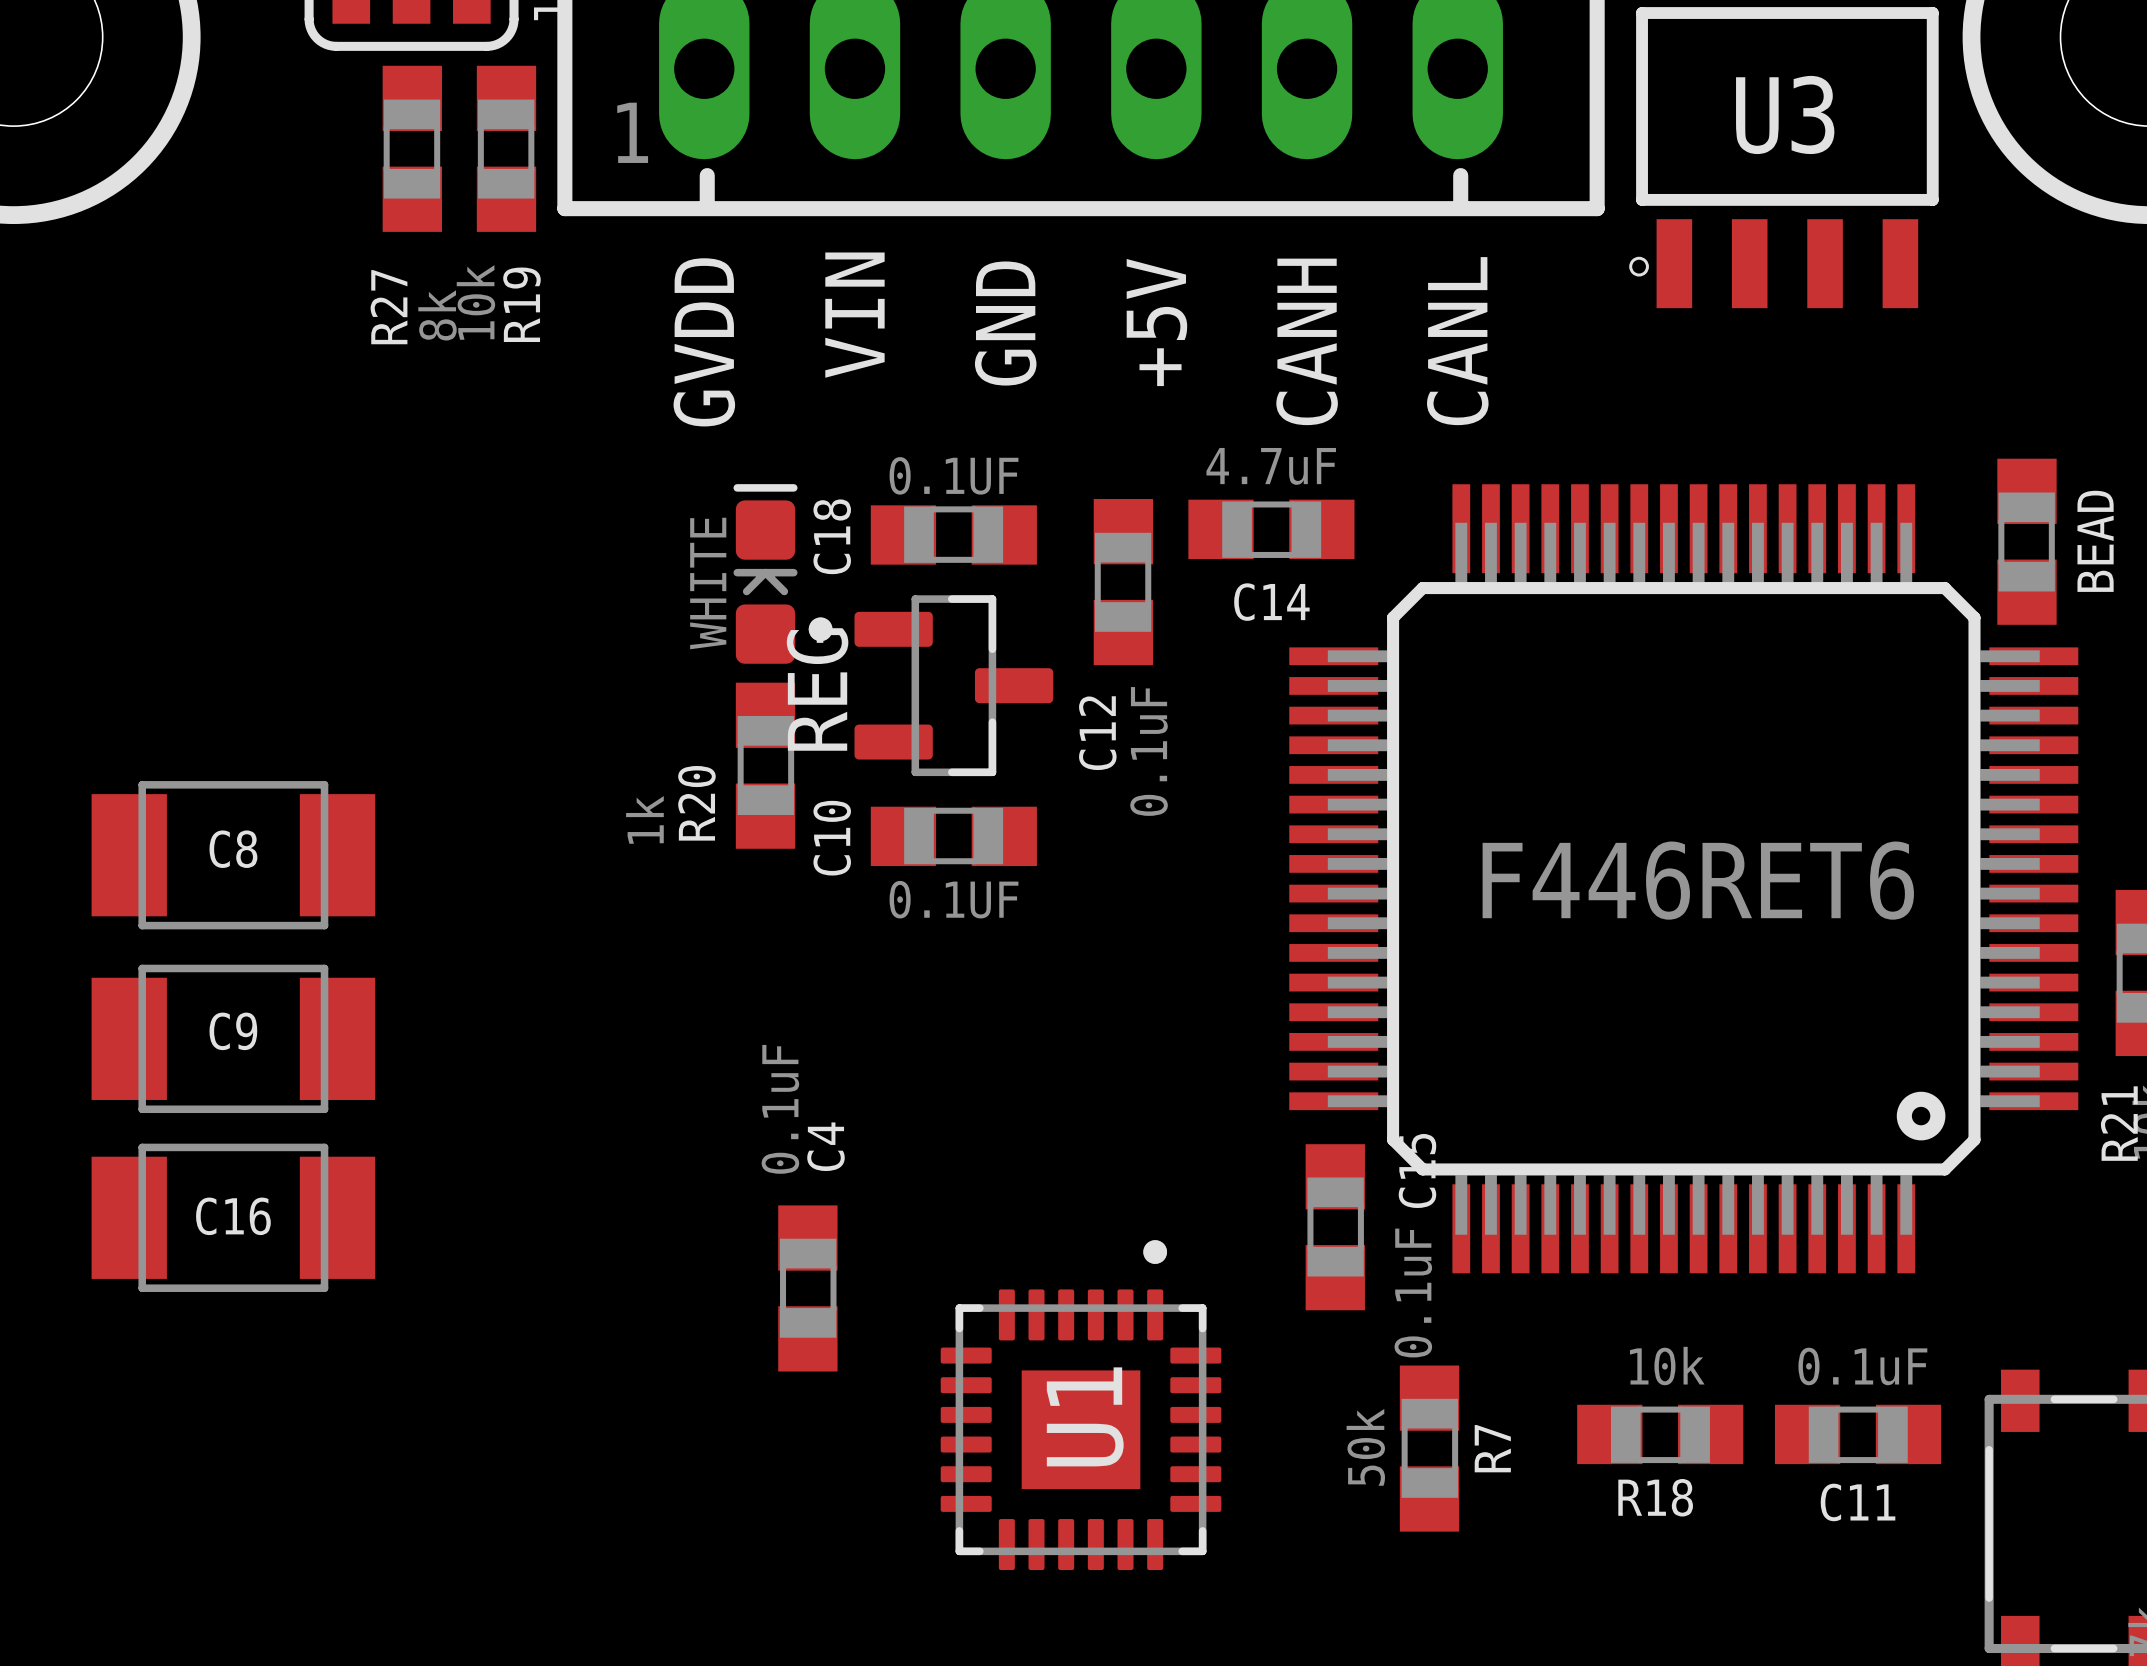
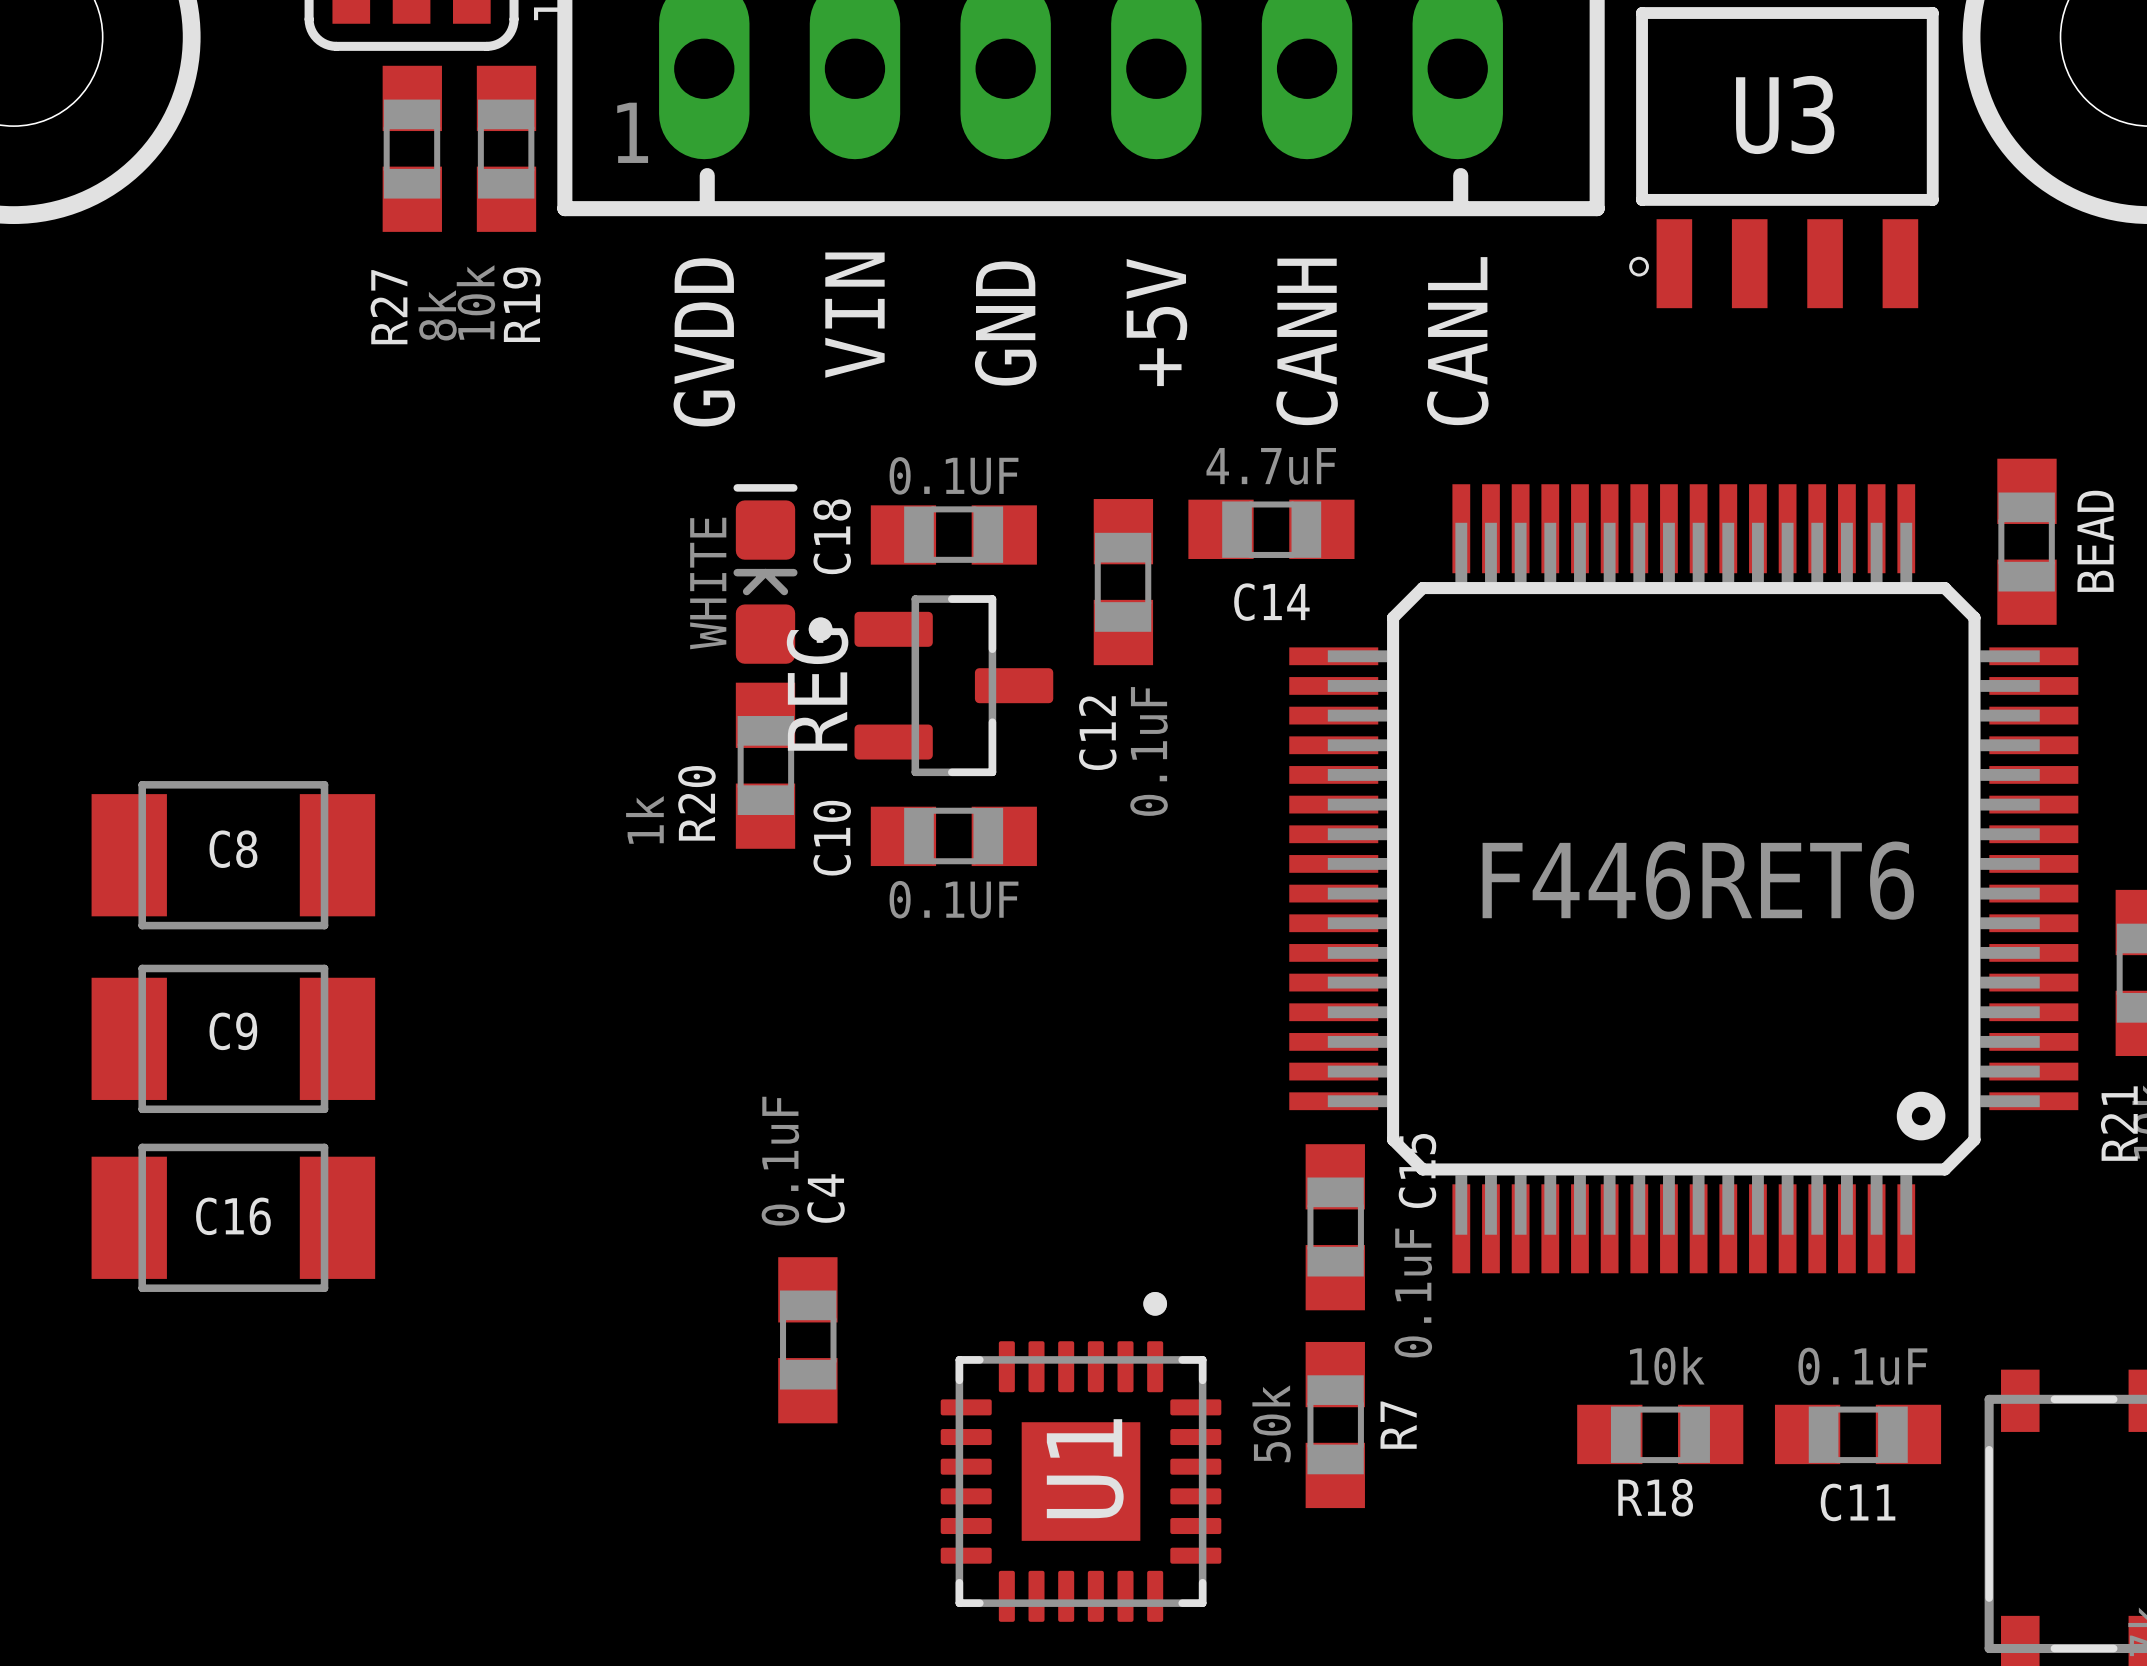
C4 position: (807, 1288) -> (807, 1340)
U1 position: (1081, 1405) -> (1081, 1456)
R7 position: (1429, 1448) -> (1335, 1425)

